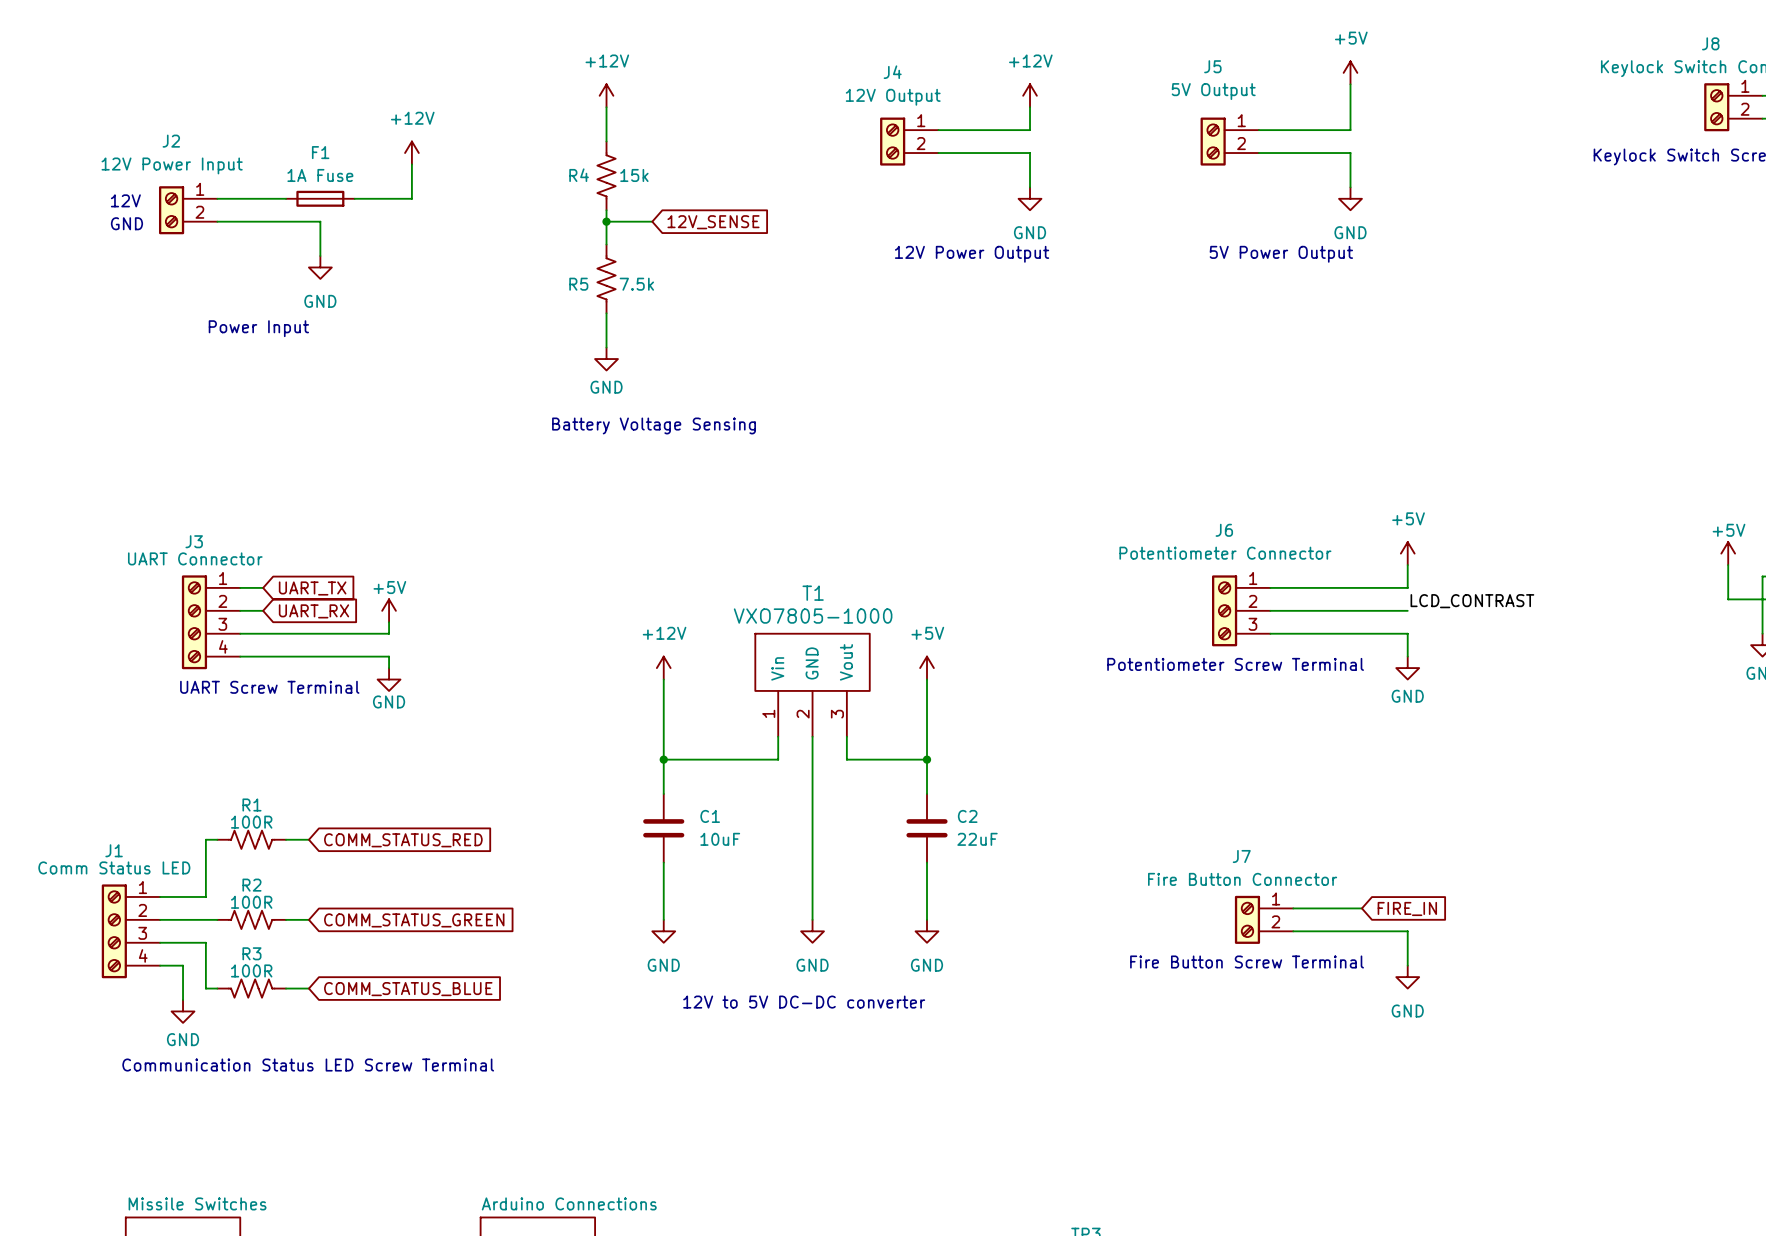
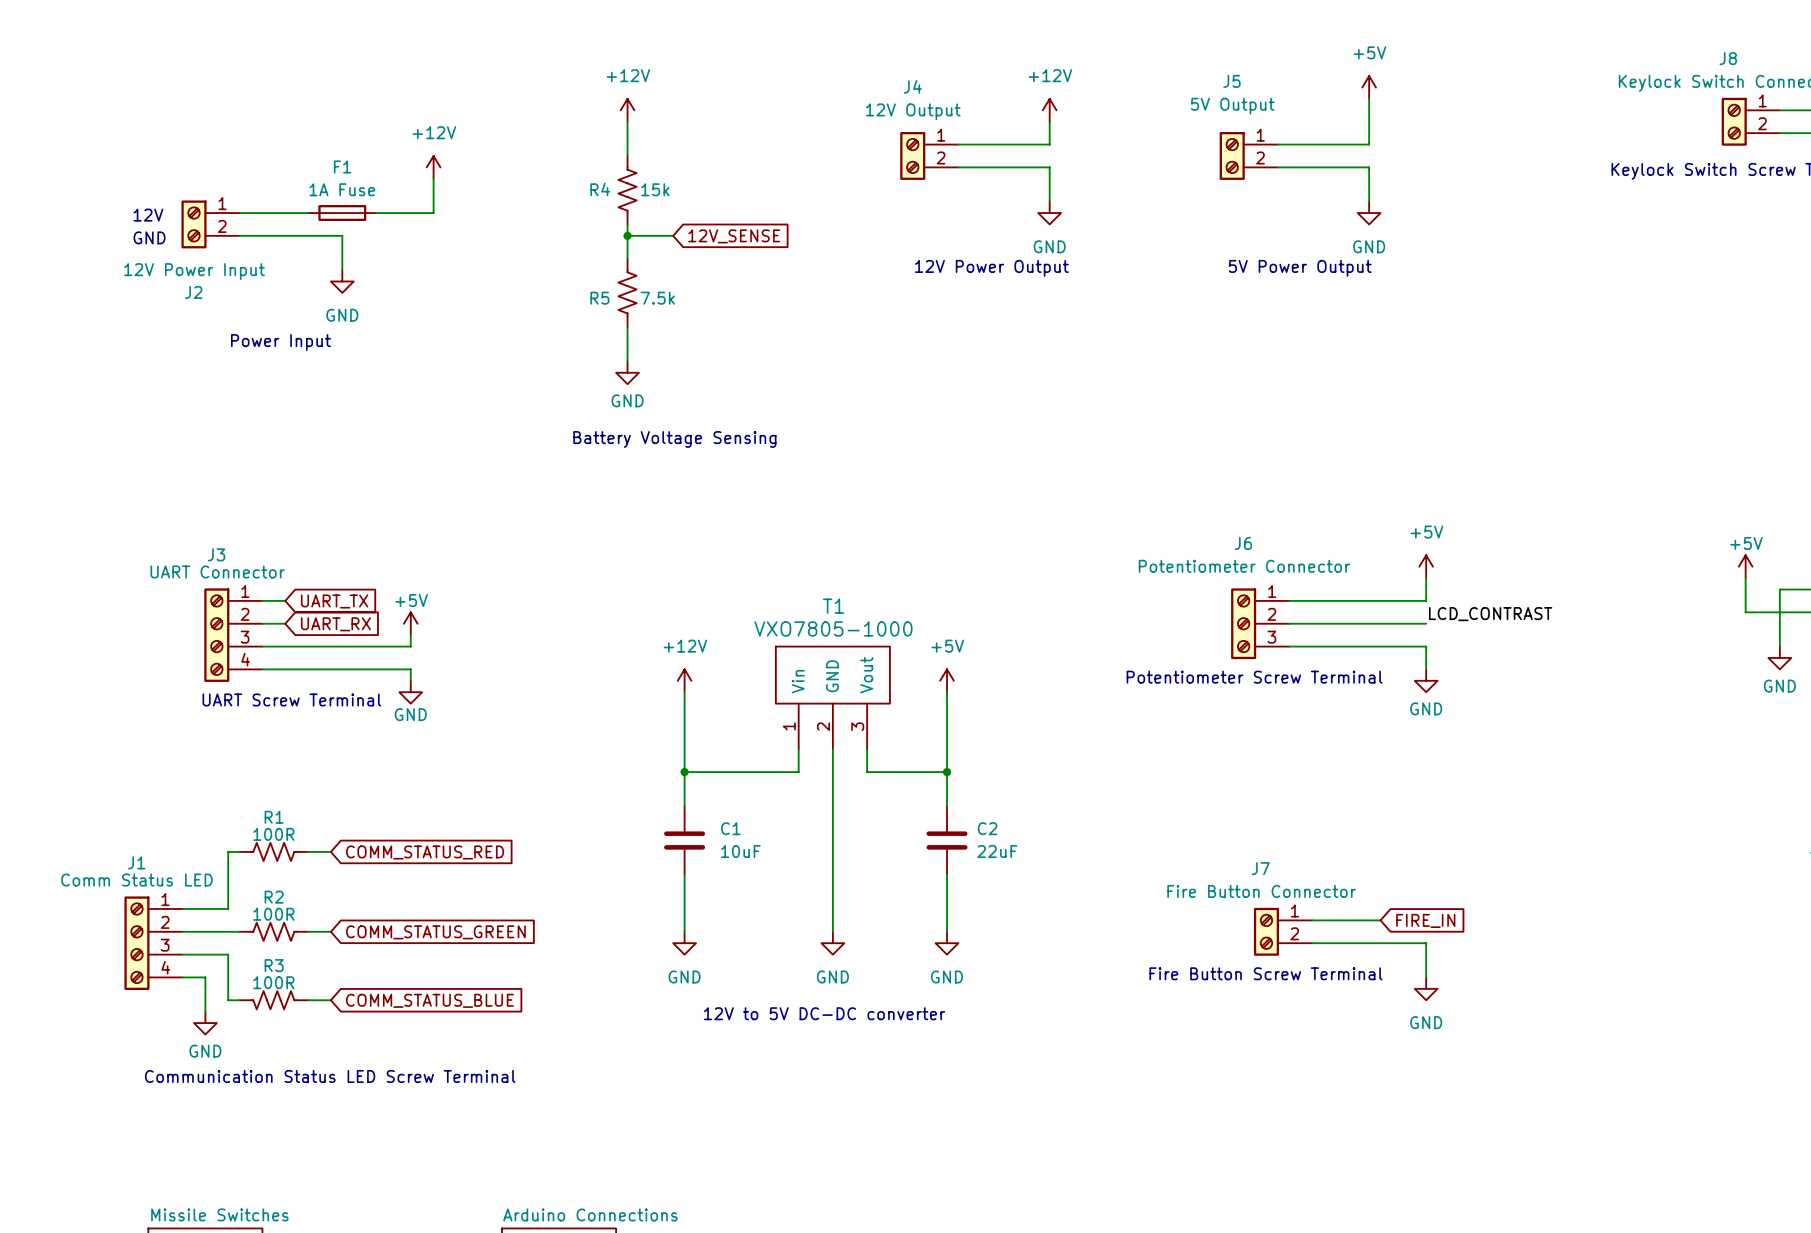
J2 name position: J2 (171, 141) -> J2 (193, 292)
J2 value position: 12V Power Input (172, 165) -> 12V Power Input (194, 271)

